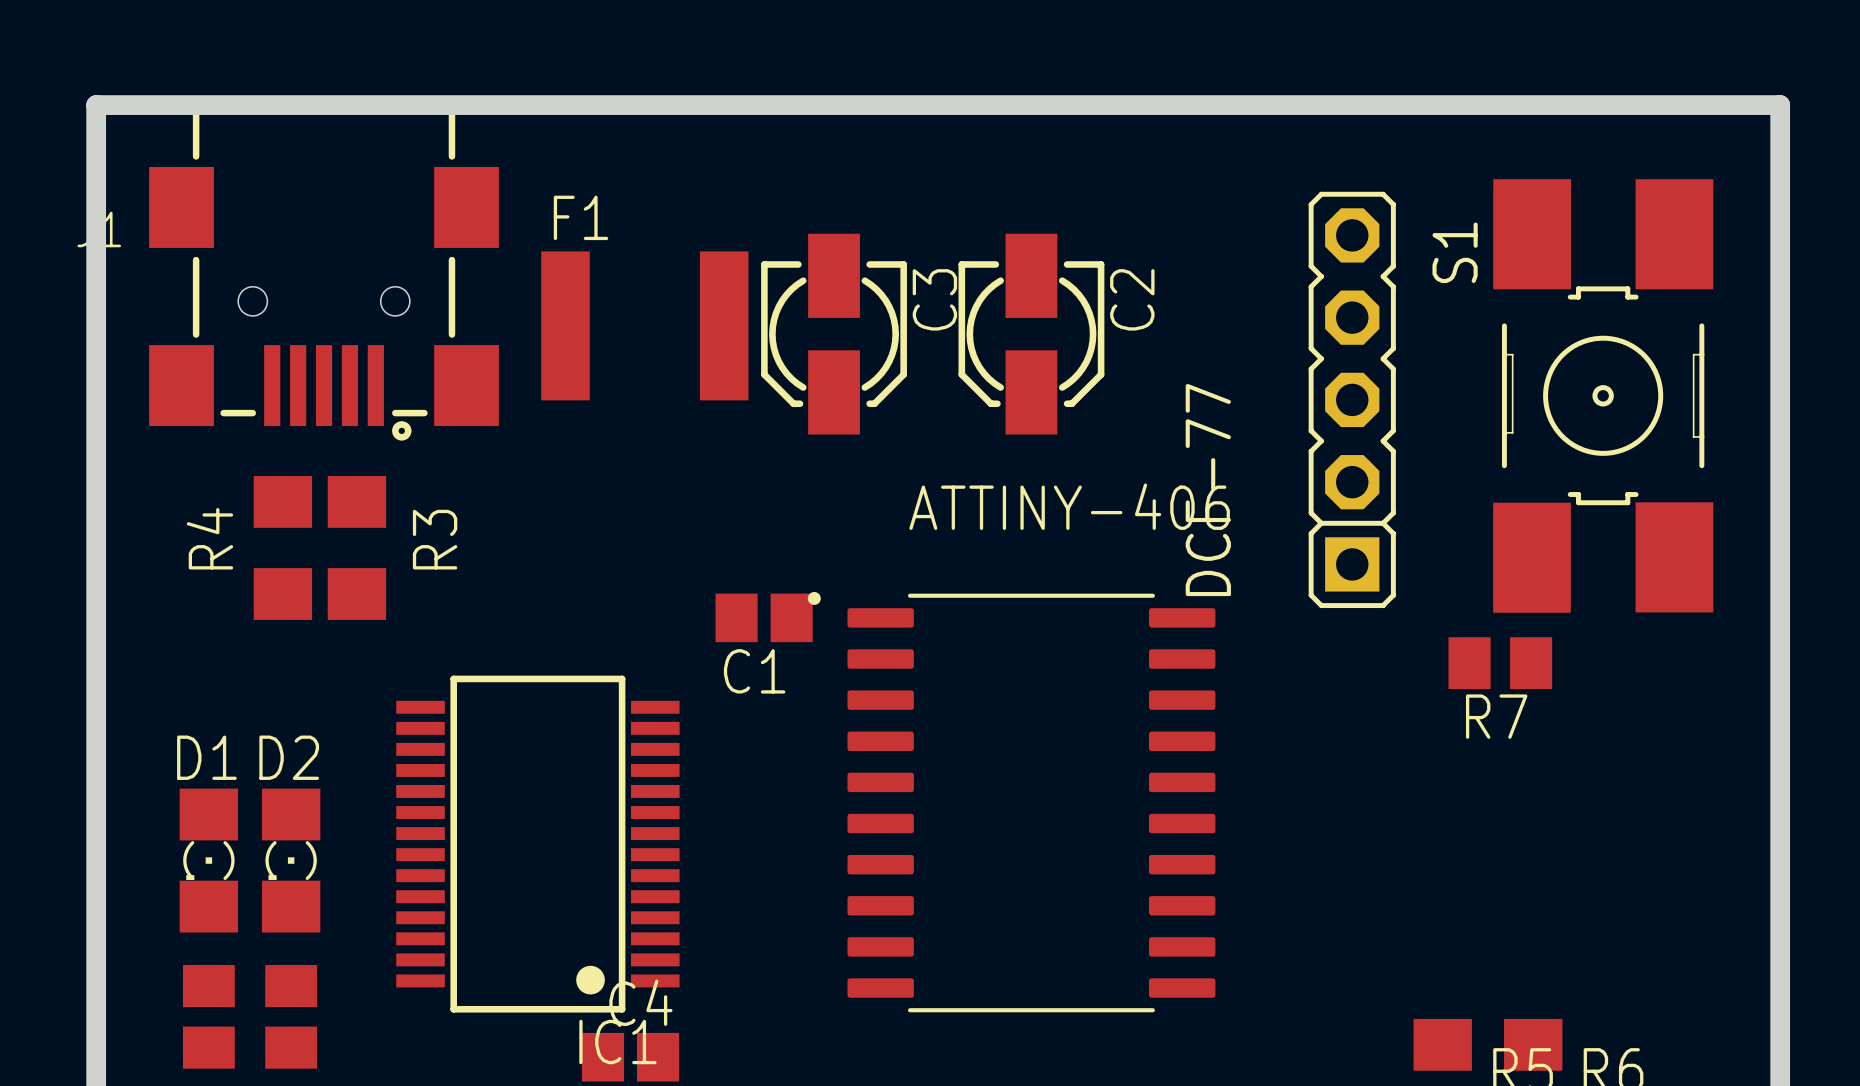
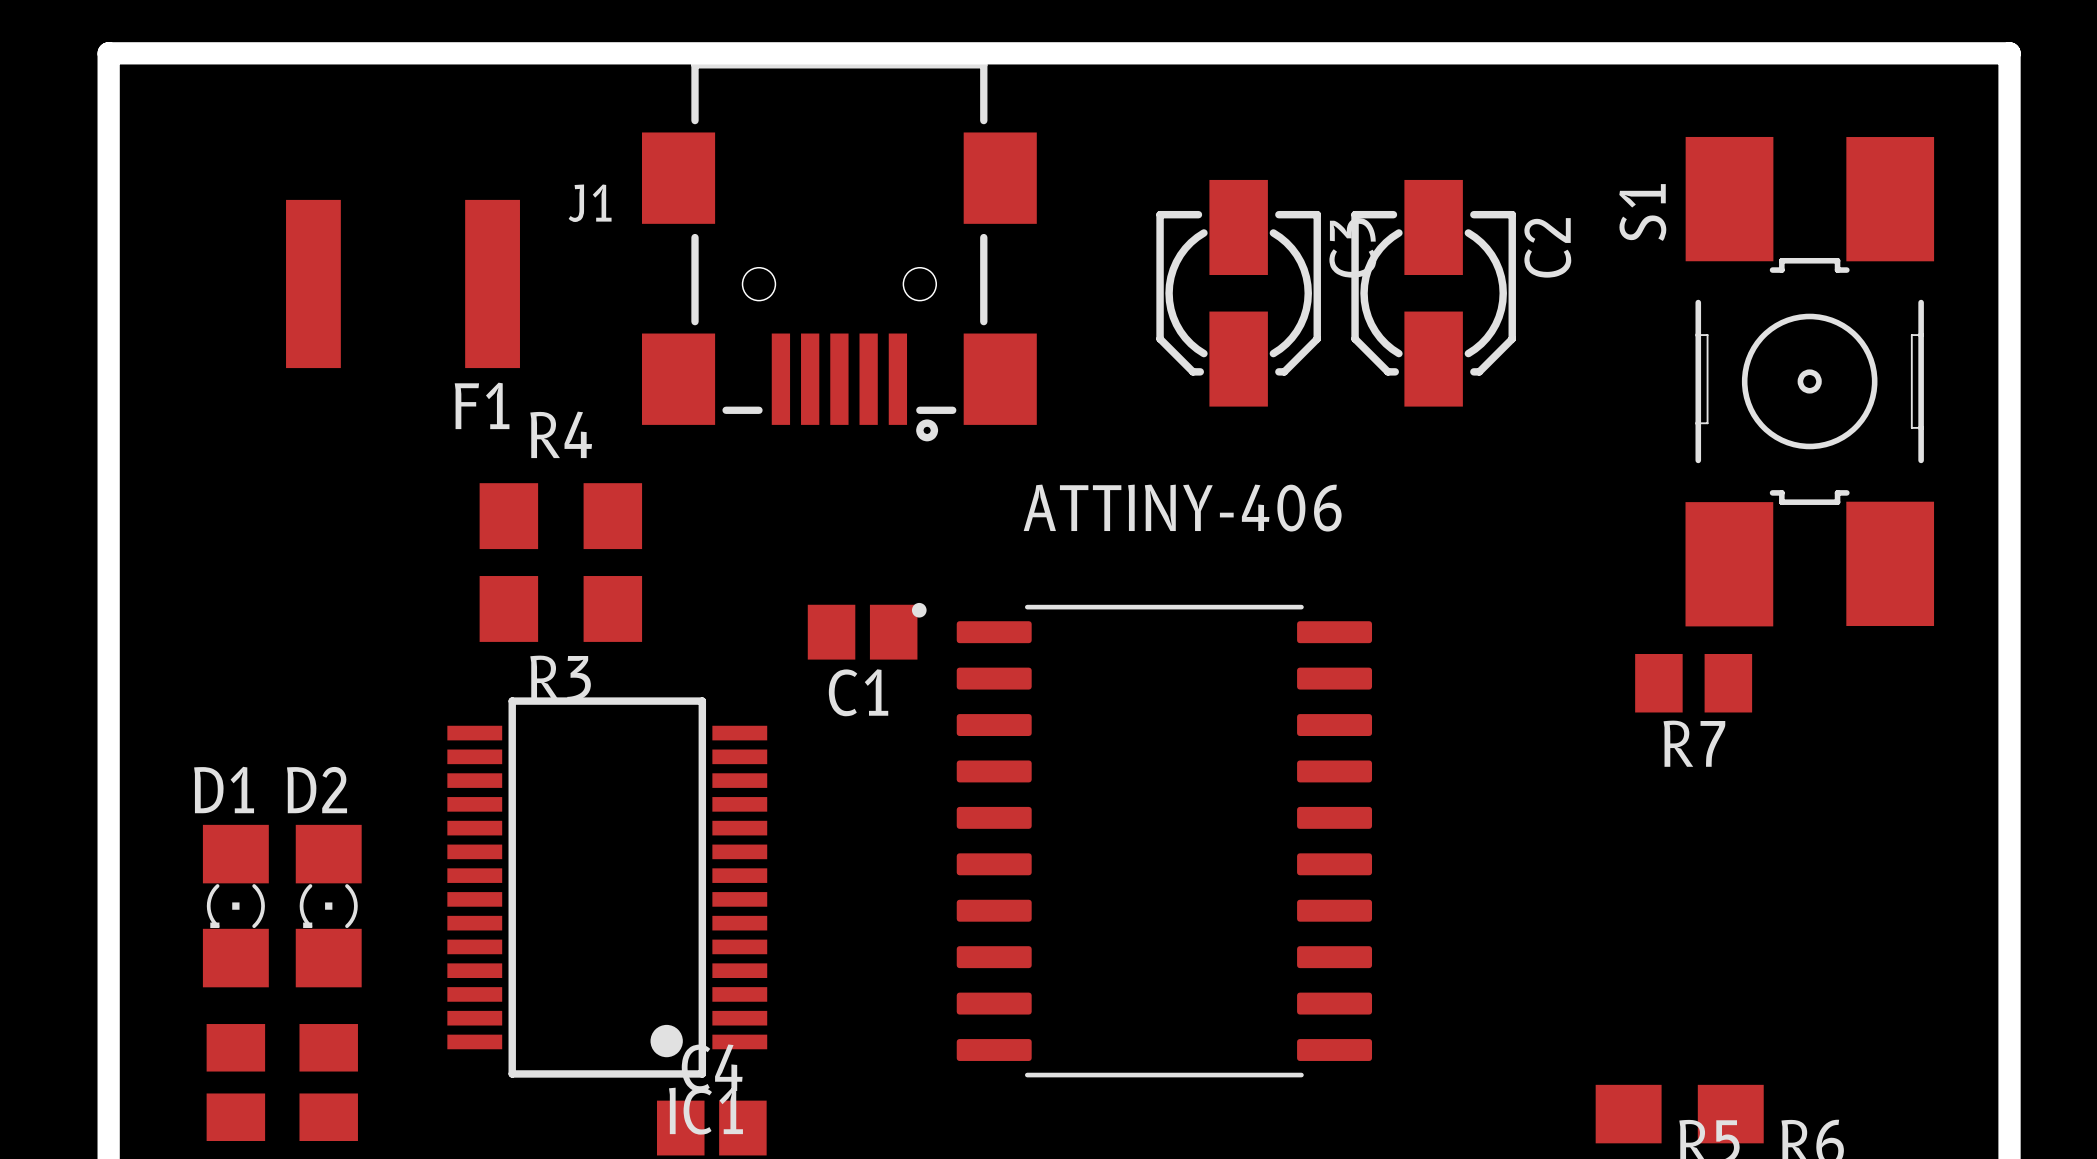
F1 name position: F1 (580, 217) -> F1 (482, 405)
J1 position: (324, 272) -> (839, 251)
F1 position: (644, 325) -> (403, 283)
C3 position: (834, 334) -> (1238, 293)
C2 position: (1031, 334) -> (1433, 293)
DCF-77: (1352, 399) -> none
R4 rotation: 0° (282, 547) -> 90° clockwise (560, 516)
R4 position: (282, 547) -> (560, 516)
R3 rotation: 0° (356, 547) -> 90° clockwise (560, 608)
R3 position: (356, 547) -> (560, 608)

